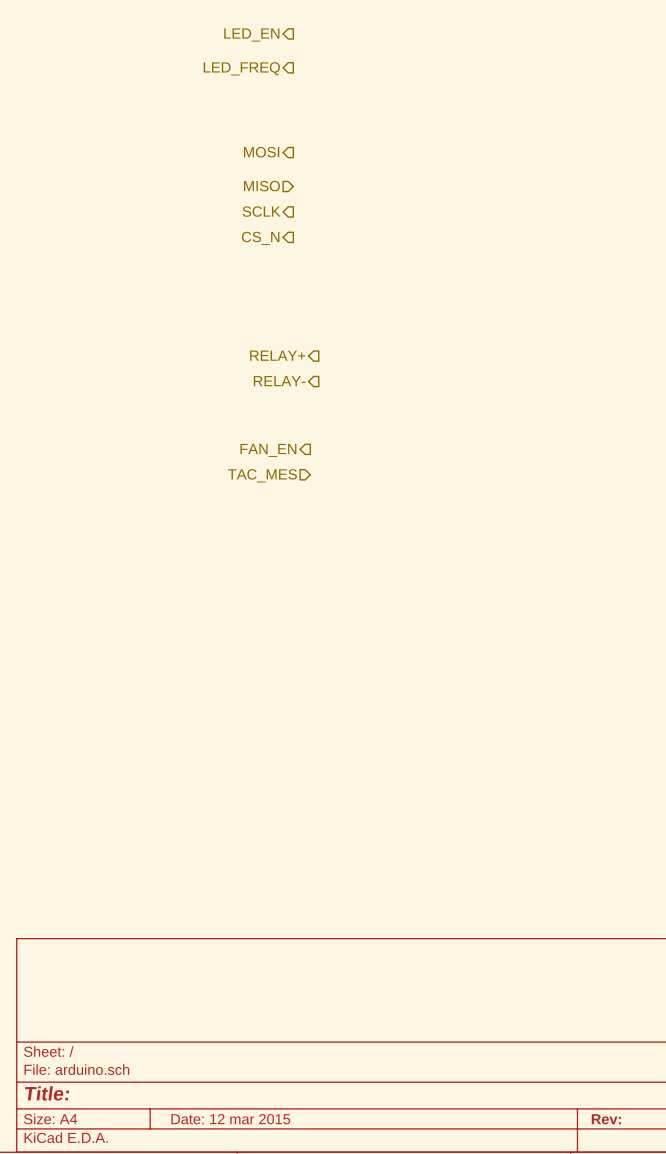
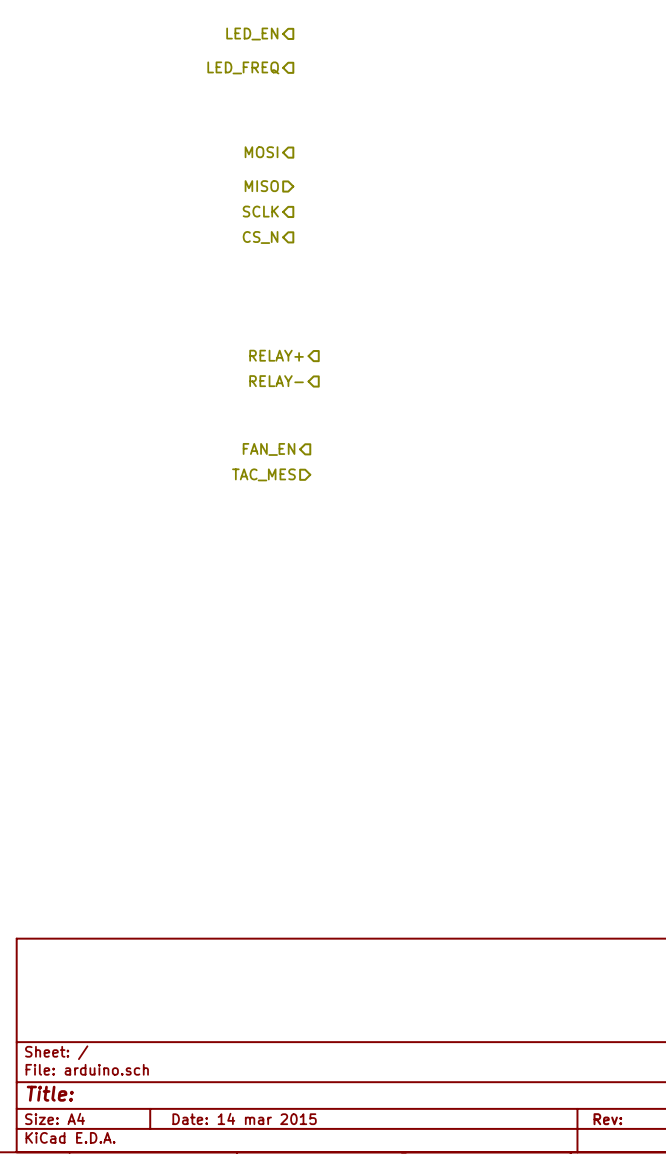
title block: Date: 12 mar 2015 (230, 1119) -> Date: 14 mar 2015 (244, 1118)

